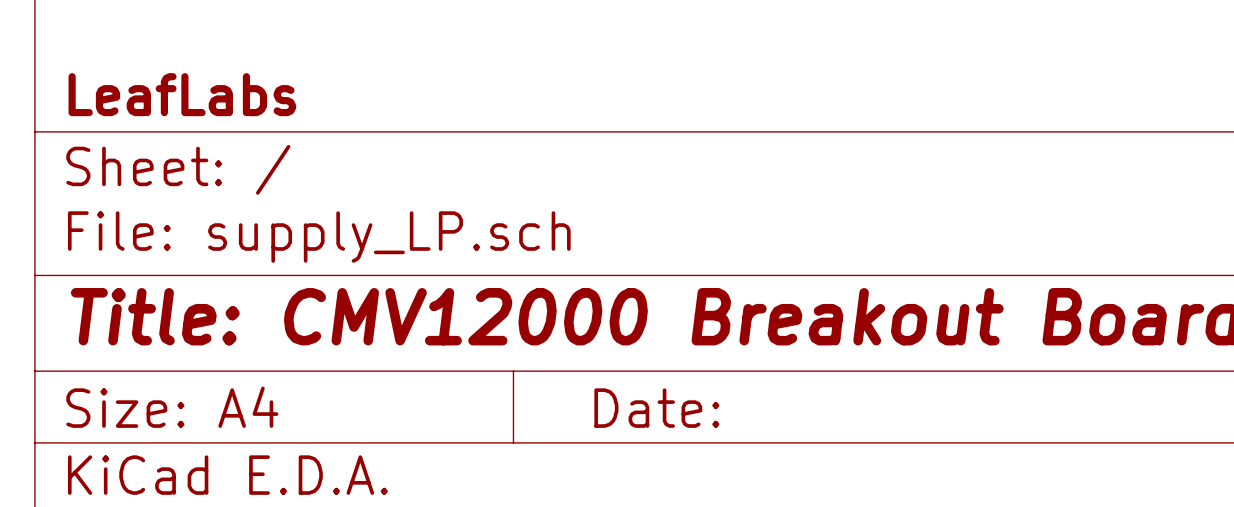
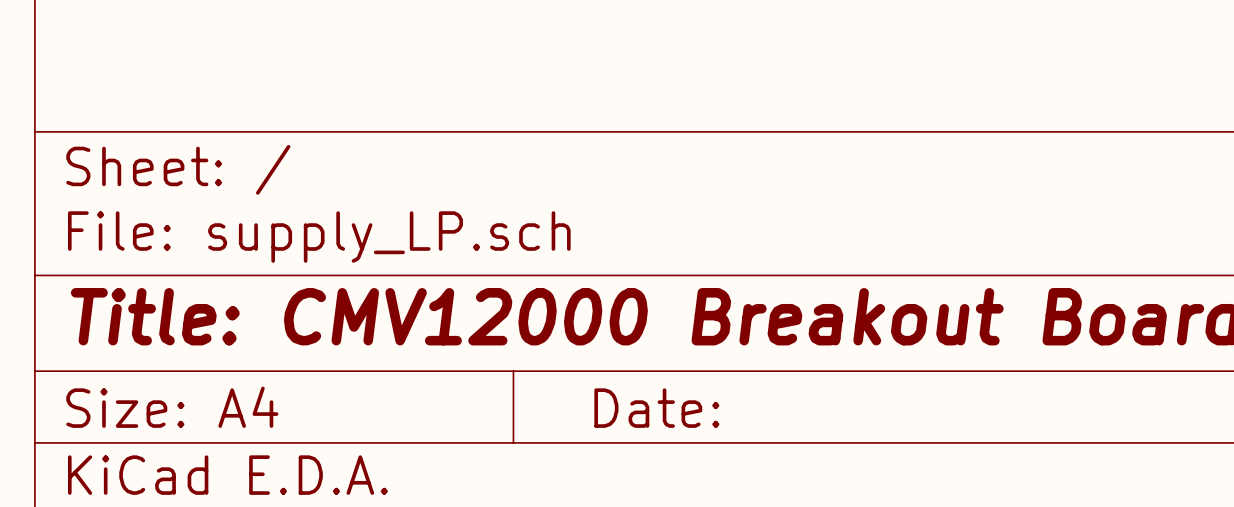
title block: LeafLabs (182, 94) -> none

